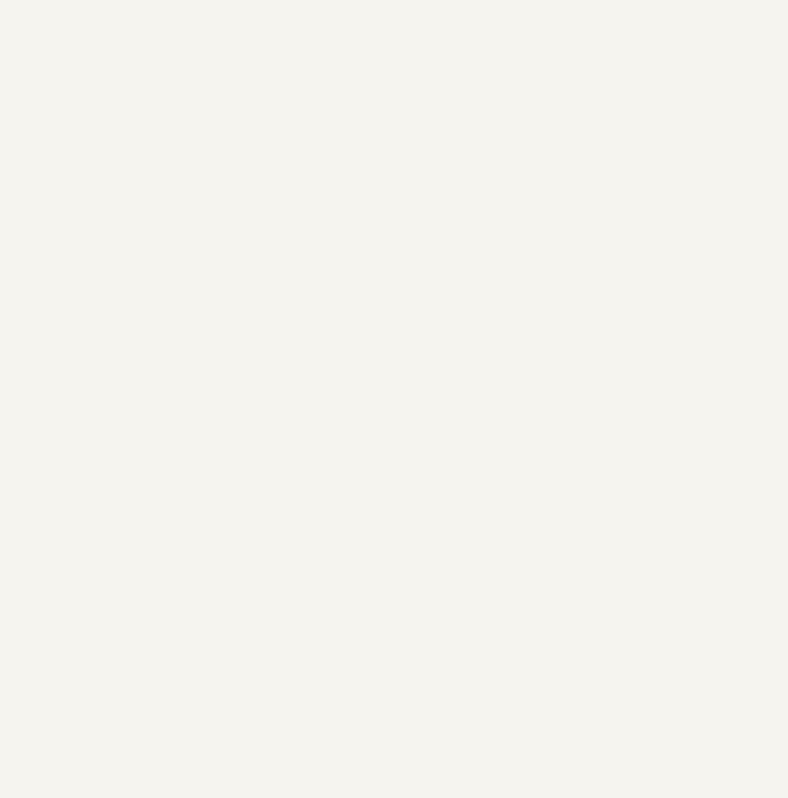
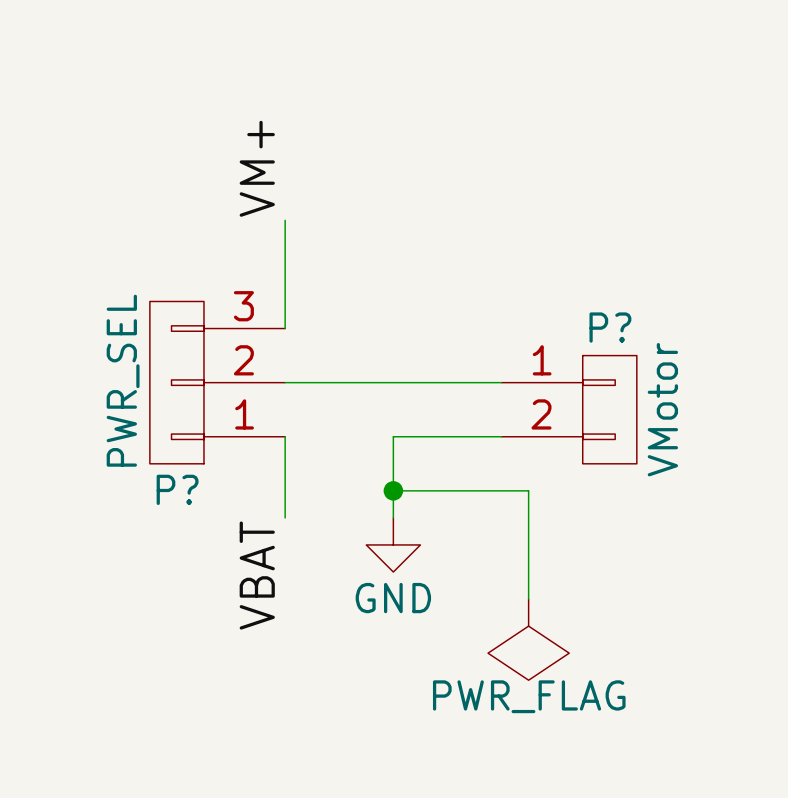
label: none -> VM+ (257, 168)
wire: none -> (285, 220) (285, 328)
P?: none -> PWR_SEL (217, 382)
wire: none -> (285, 382) (501, 382)
P?: none -> VMotor (569, 409)
wire: none -> (285, 436) (285, 517)
wire: none -> (501, 436) (393, 436) (393, 517)
wire: none -> (393, 490) (528, 490) (528, 599)
junction: none -> (393, 490)
power symbol: none -> GND (393, 544)
label: none -> VBAT (257, 575)
power symbol: none -> PWR_FLAG (528, 639)

